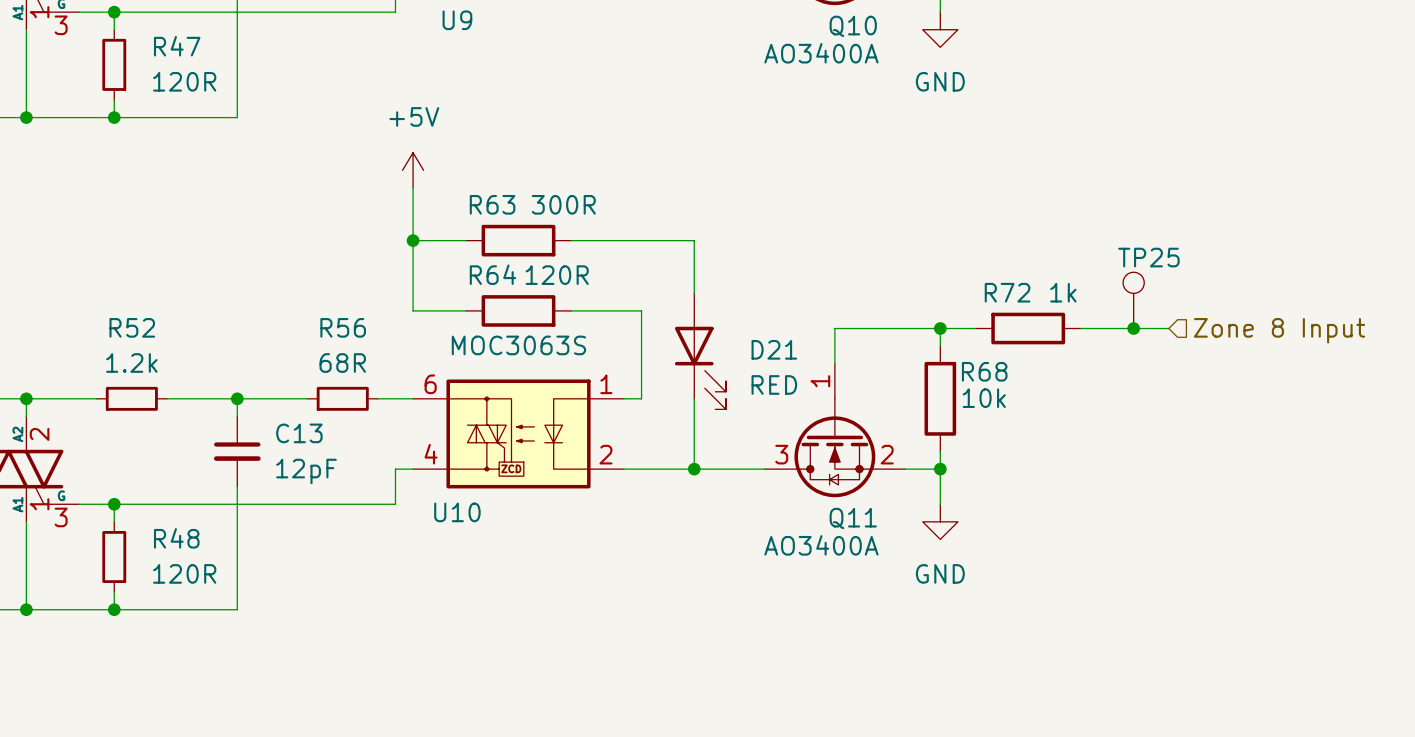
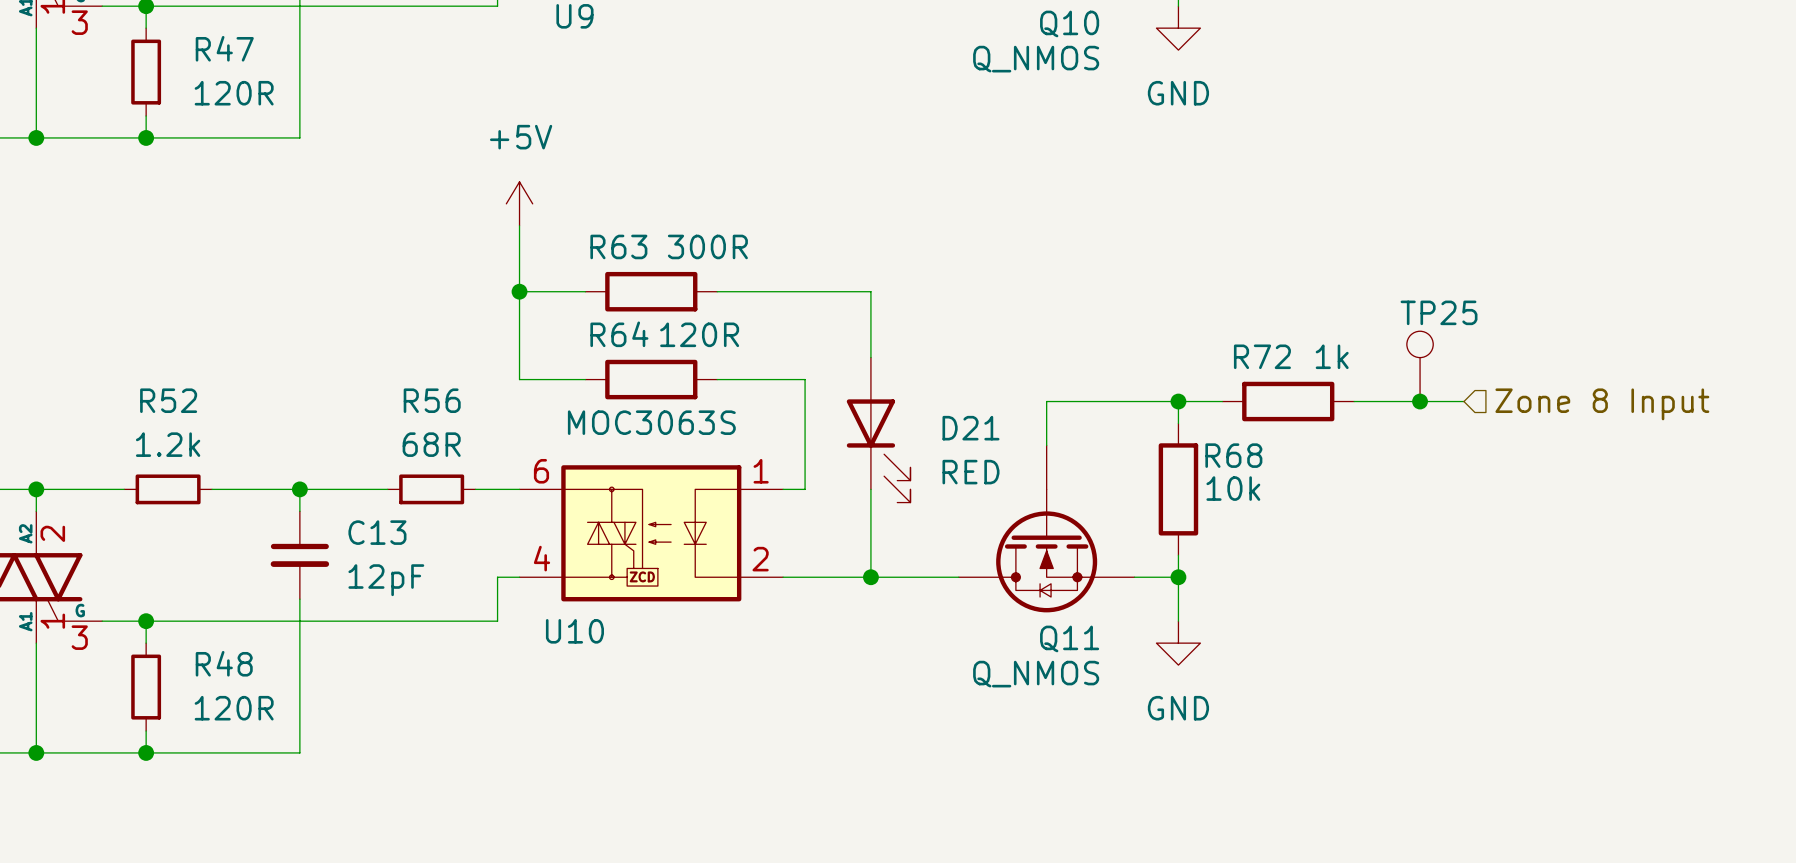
Q10 value: AO3400A (821, 53) -> Q_NMOS (1036, 59)
Q11 pin number: 1 (820, 381) -> none
Q11 pin number: 3 (781, 454) -> none
Q11 pin number: 2 (887, 454) -> none
Q11 value: AO3400A (821, 545) -> Q_NMOS (1036, 674)

